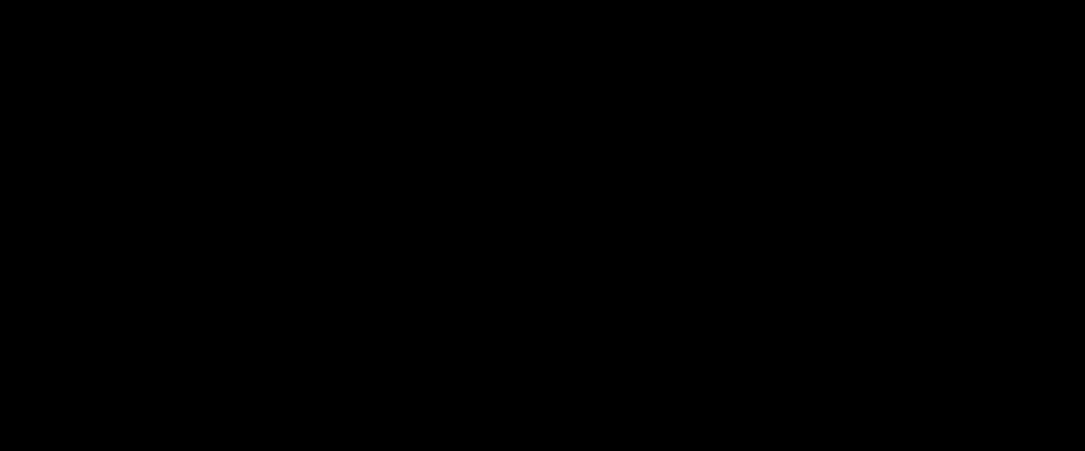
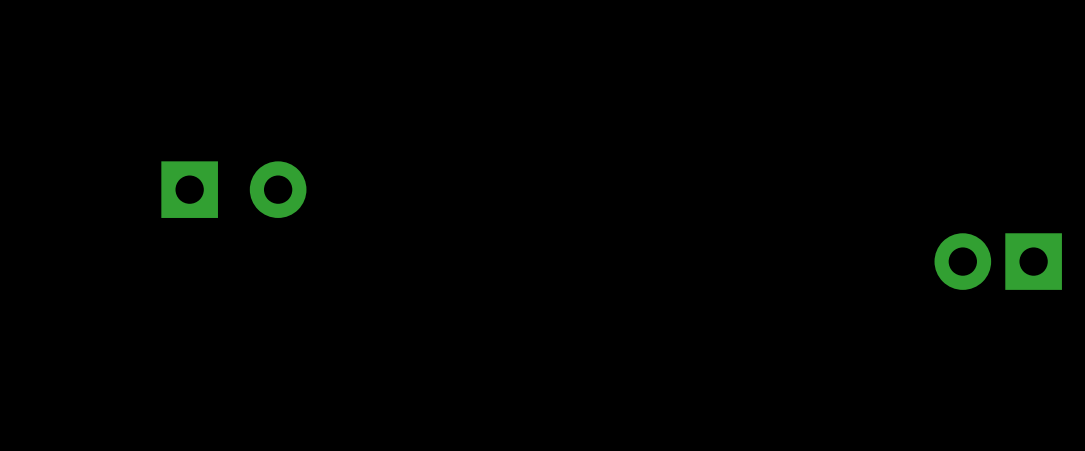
part: none -> (233, 189)
part: none -> (998, 261)

